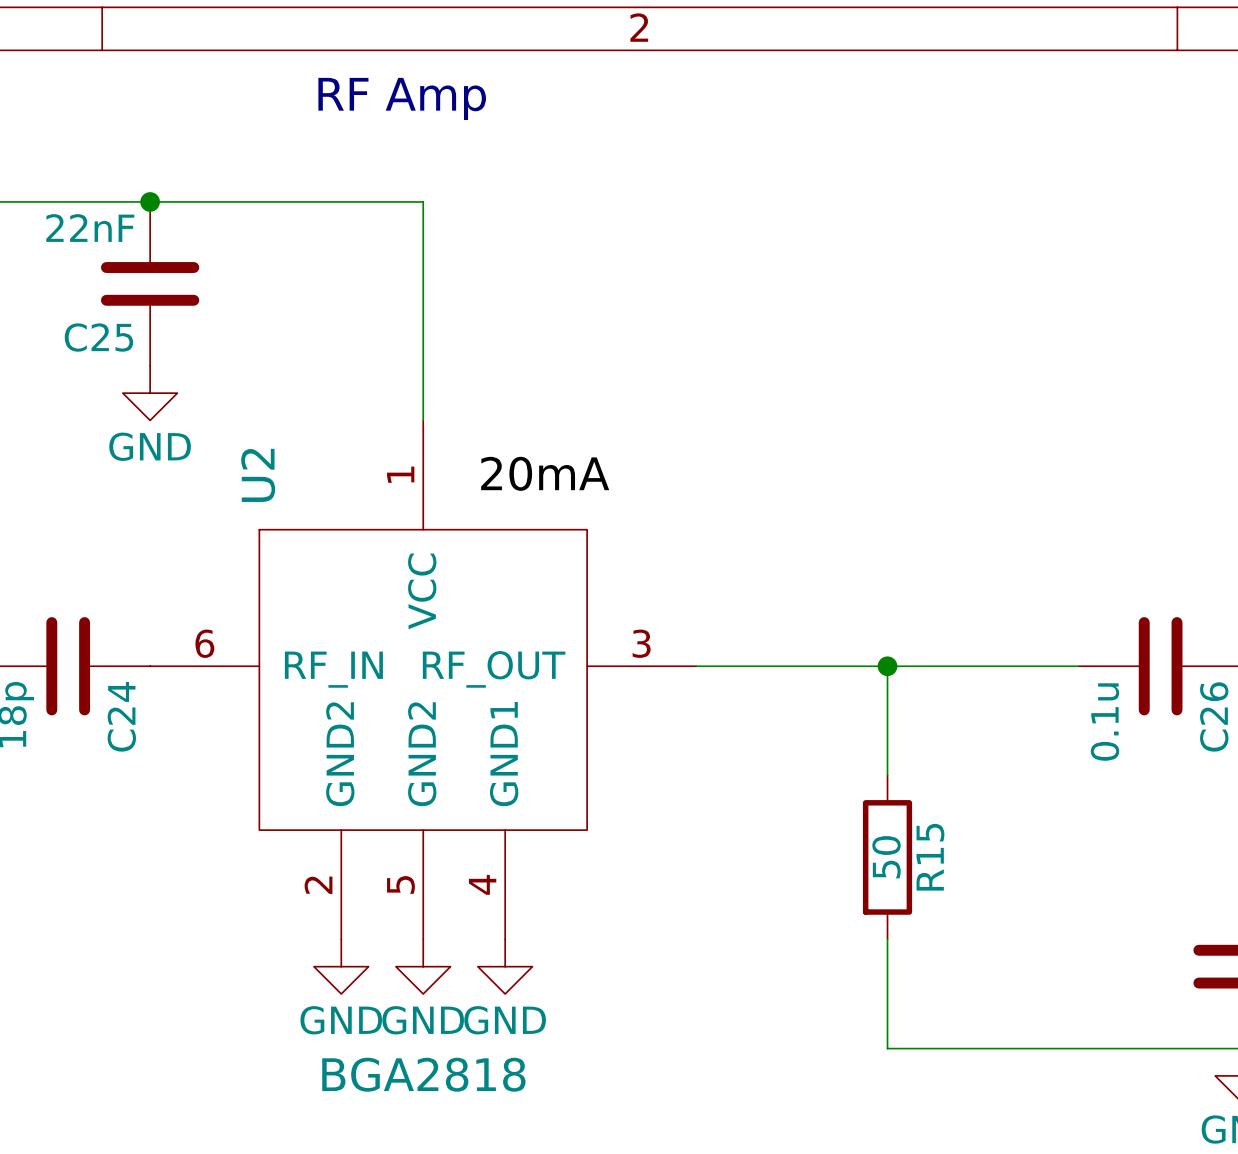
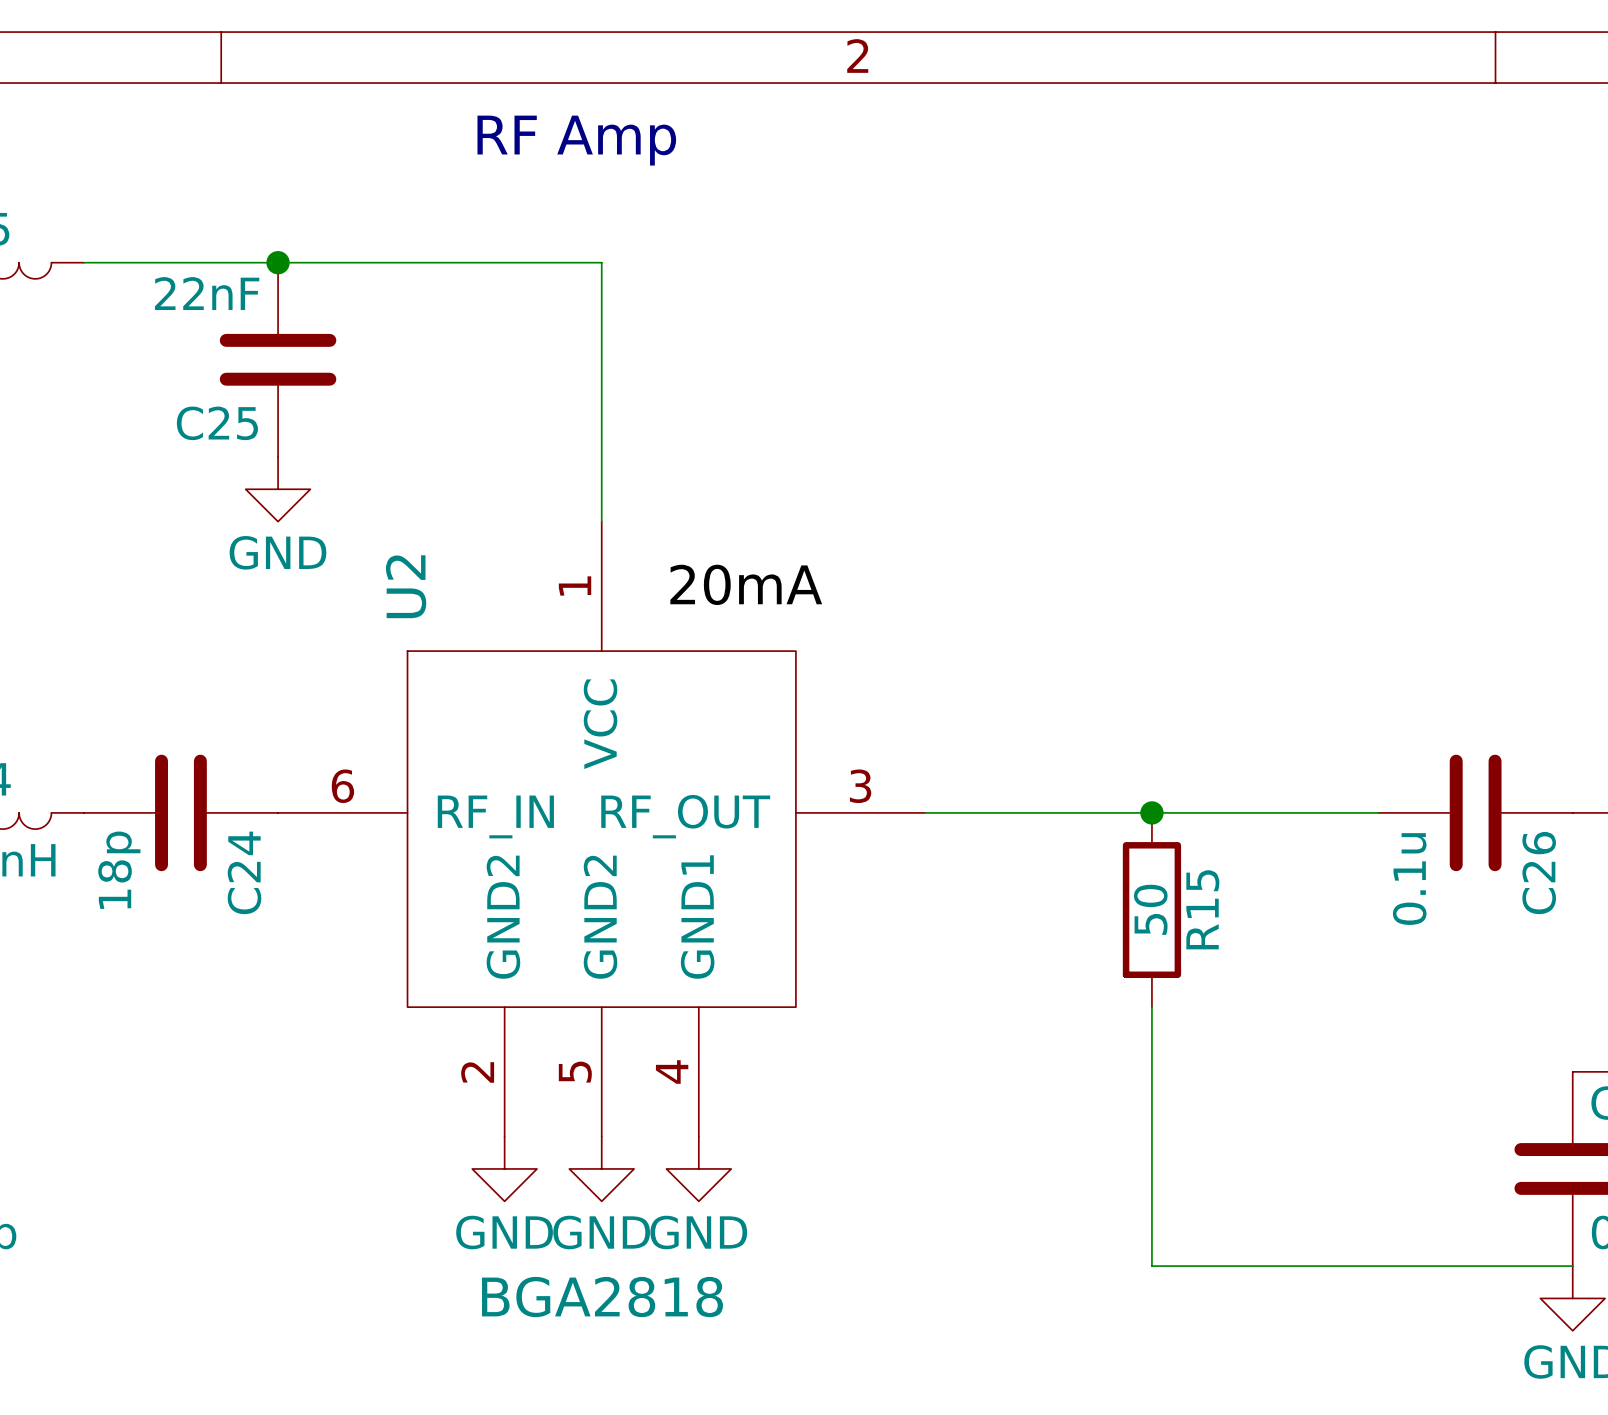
wire: (887, 666) (887, 775) -> (1151, 1007) (1151, 1136)
R15 position: (887, 857) -> (1151, 910)

